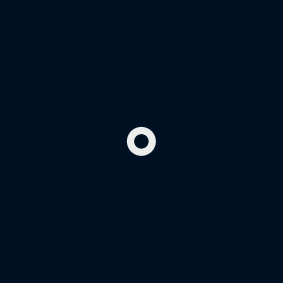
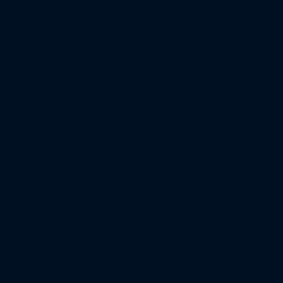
via: (141, 141) -> none

